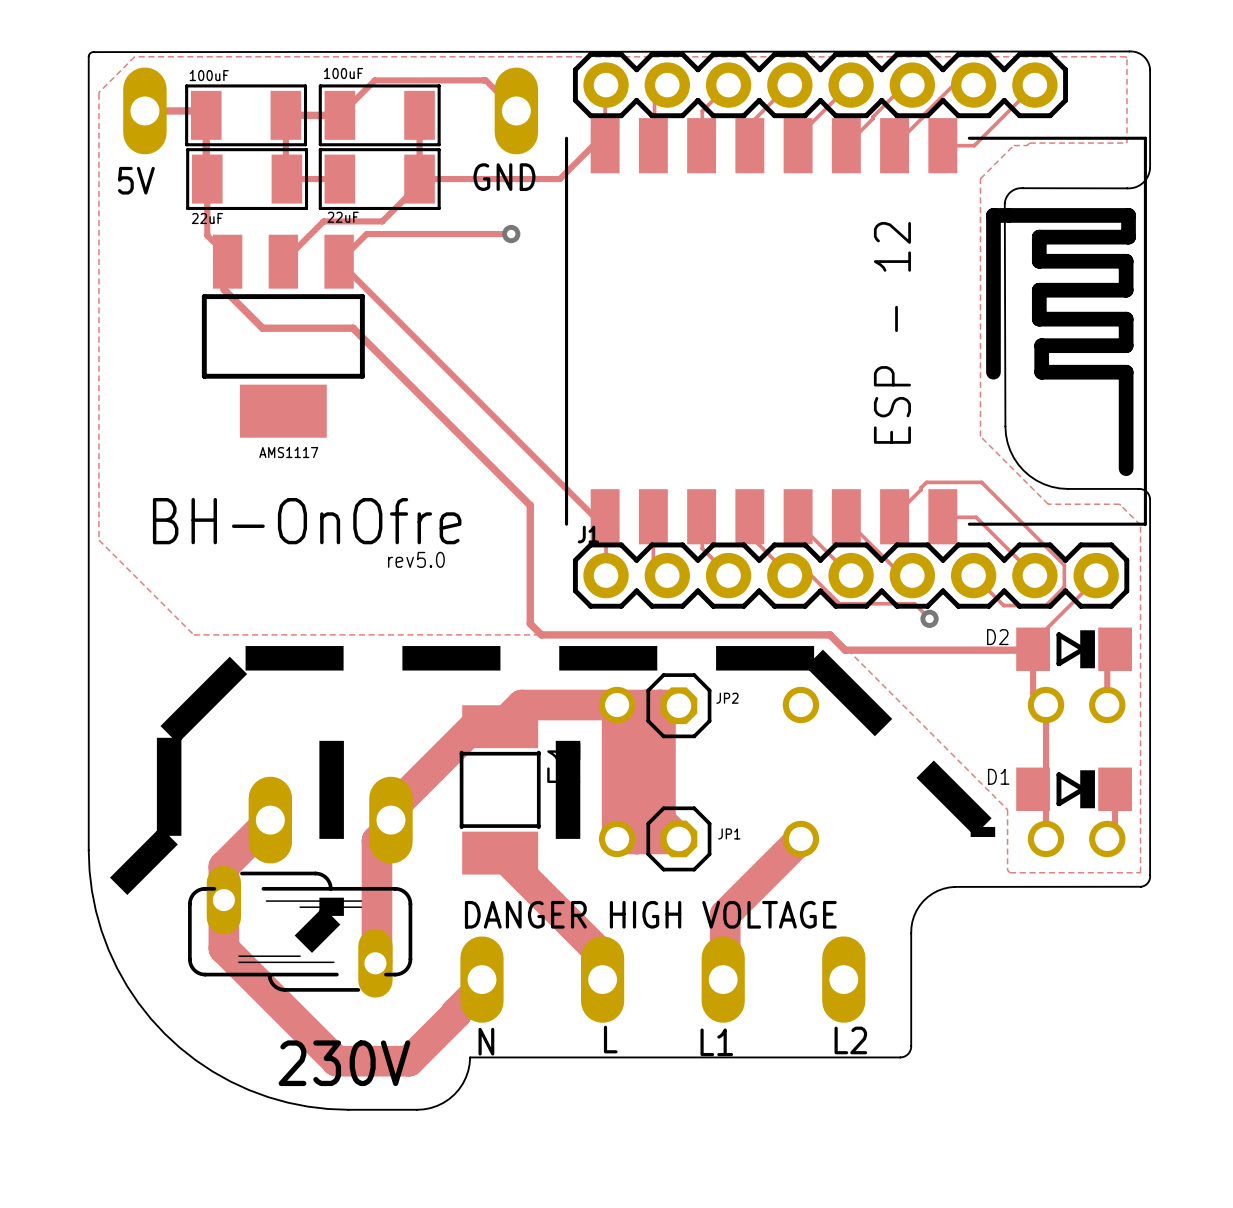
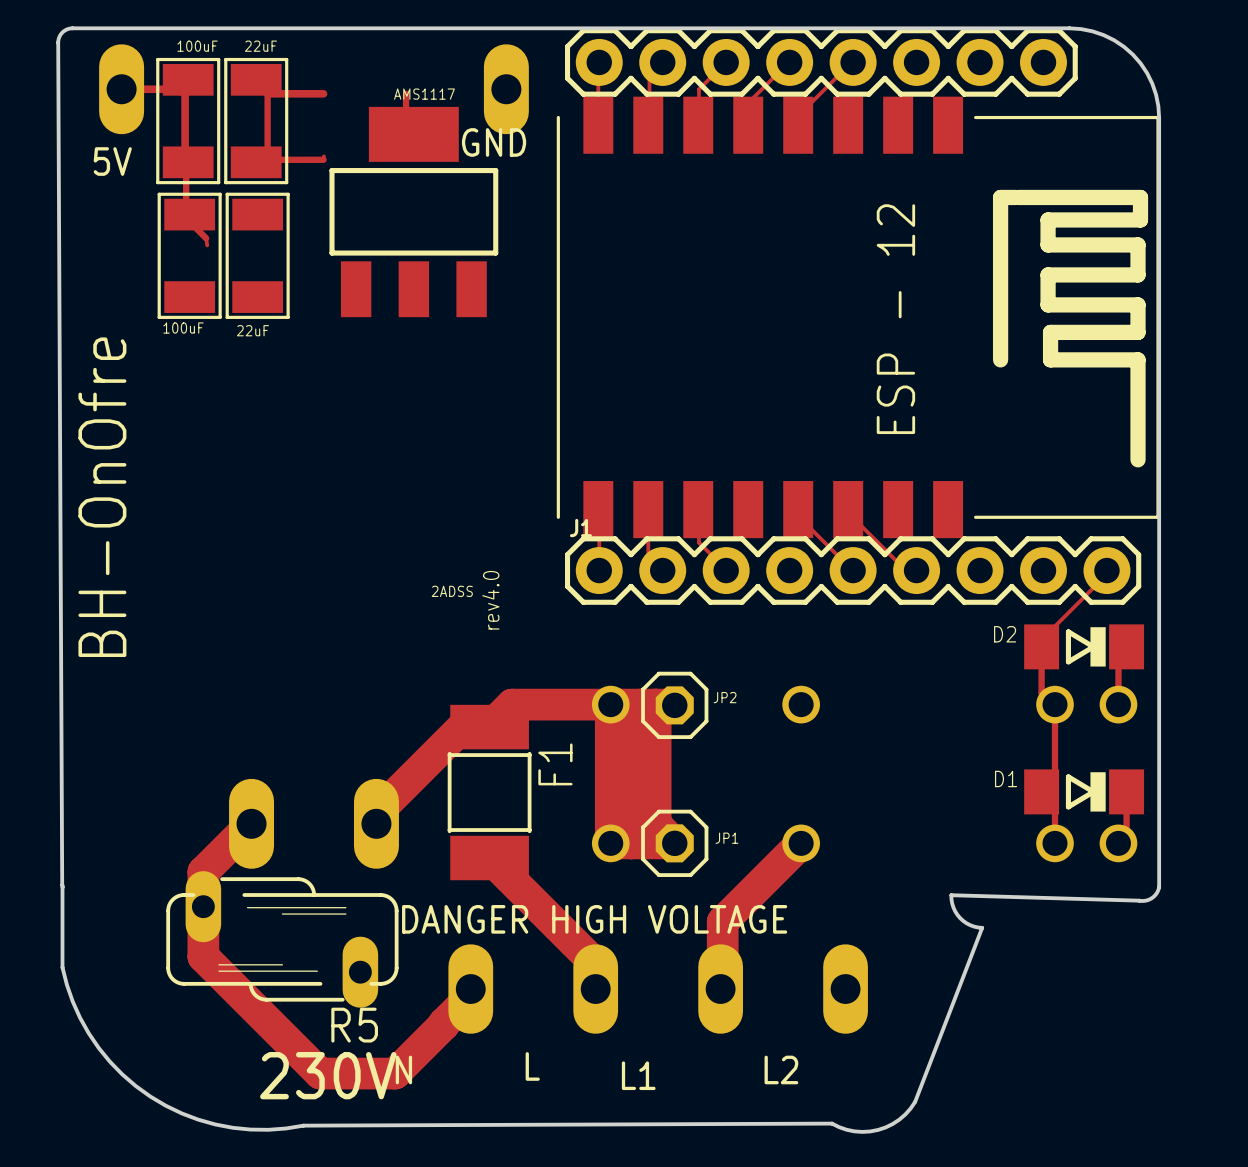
board edge: (1129, 51) (93, 52) (90, 53) (89, 870) (95, 910) (108, 949) (117, 968) (138, 1002) (164, 1033) (195, 1060) (230, 1081) (249, 1090) (268, 1097) (307, 1106) (348, 1109) (416, 1109) (437, 1105) (449, 1099) (458, 1089) (465, 1077) (470, 1057) (901, 1057) (908, 1053) (911, 1047) (912, 921) (919, 905) (932, 893) (943, 888) (954, 886) (1141, 886) (1147, 883) (1150, 876) (1149, 496) (1146, 491) (1139, 488) (1067, 488) (1043, 484) (1029, 476) (1013, 457) (1007, 442) (1005, 426) (1005, 198) (1010, 191) (1018, 188) (1130, 188) (1138, 186) (1144, 181) (1150, 168) (1150, 69) (1143, 56) (1129, 51) -> (72, 28) (62, 32) (58, 42) (62, 967) (72, 1001) (88, 1033) (109, 1061) (135, 1086) (165, 1105) (198, 1119) (232, 1127) (250, 1129) (286, 1128) (303, 1125) (832, 1123) (854, 1131) (870, 1131) (885, 1127) (899, 1119) (915, 1101) (982, 927) (970, 925) (959, 917) (953, 907) (951, 895) (1141, 900) (1150, 899) (1155, 895) (1159, 887) (1159, 117) (1156, 94) (1152, 83) (1140, 63) (1124, 46) (1103, 35) (1081, 29) (1069, 28) (72, 28)
zone outline: (134, 56) (1125, 56) (1126, 143) (1029, 143) (1027, 145) (1013, 145) (980, 178) (980, 436) (1048, 504) (1119, 504) (1140, 525) (1140, 872) (1010, 872) (1007, 870) (1007, 809) (832, 634) (193, 634) (98, 540) (98, 92) (134, 56) -> none
track: (912, 85) (904, 85) (846, 145) -> none
track: (973, 85) (953, 85) (894, 145) -> none
track: (1034, 85) (974, 145) (942, 145) -> none
track: (516, 110) (485, 80) (374, 80) (339, 115) -> none
part rotation: 0° (246, 115) -> 90° clockwise (188, 121)
part: 100uF (379, 115) -> none
track: (605, 133) (559, 179) (419, 179) -> none
text position: GND (504, 177) -> GND (494, 142)
part rotation: 0° (247, 179) -> 90° clockwise (256, 121)
part: 22uF (379, 179) -> none
track: (424, 179) (382, 221) (323, 221) (283, 261) -> none
part value position: 22uF (207, 218) -> 22uF (260, 46)
track: (511, 234) (366, 234) (339, 261) -> none
via: (511, 234) -> none
track: (224, 241) (224, 258) (227, 261) (223, 265) (223, 289) (262, 328) (353, 328) (530, 505) (530, 623) (541, 634) (829, 634) (845, 650) (1027, 650) -> none
track: (339, 261) (606, 528) (606, 537) -> none
part: none -> 100uF (189, 255)
part: none -> 22uF (257, 255)
AMS1117 rotation: 0° (283, 336) -> 180° (413, 212)
AMS1117 position: (283, 336) -> (413, 212)
track: (749, 516) (749, 535) (789, 575) (811, 575) (839, 603) (914, 603) (929, 618) -> none
track: (894, 516) (926, 482) (981, 482) (1064, 565) (1064, 587) (1046, 605) (1003, 605) (973, 575) -> none
track: (942, 516) (976, 517) (1034, 575) -> none
text rotation: 0° (307, 521) -> 90° counterclockwise (102, 497)
text: rev5.0 (416, 559) -> none
text: none -> 2ADSS (452, 591)
text: none -> rev4.0 (490, 600)
via: (929, 618) -> none
board edge: (331, 740) (331, 915) (303, 944) -> none
board edge: (568, 740) (568, 857) -> none
track: (390, 820) (384, 833) (376, 840) (376, 962) (375, 963) -> none
board edge: (982, 837) (982, 826) (814, 658) (245, 658) (169, 734) (169, 835) (118, 886) -> none
text position: DANGER HIGH VOLTAGE (650, 914) -> DANGER HIGH VOLTAGE (594, 919)
R5 name: none -> R5 (354, 1025)
text position: L (610, 1039) -> L (532, 1066)
text position: L2 (850, 1040) -> L2 (781, 1069)
text position: N (486, 1041) -> N (403, 1069)
text position: L1 (716, 1042) -> L1 (638, 1075)

